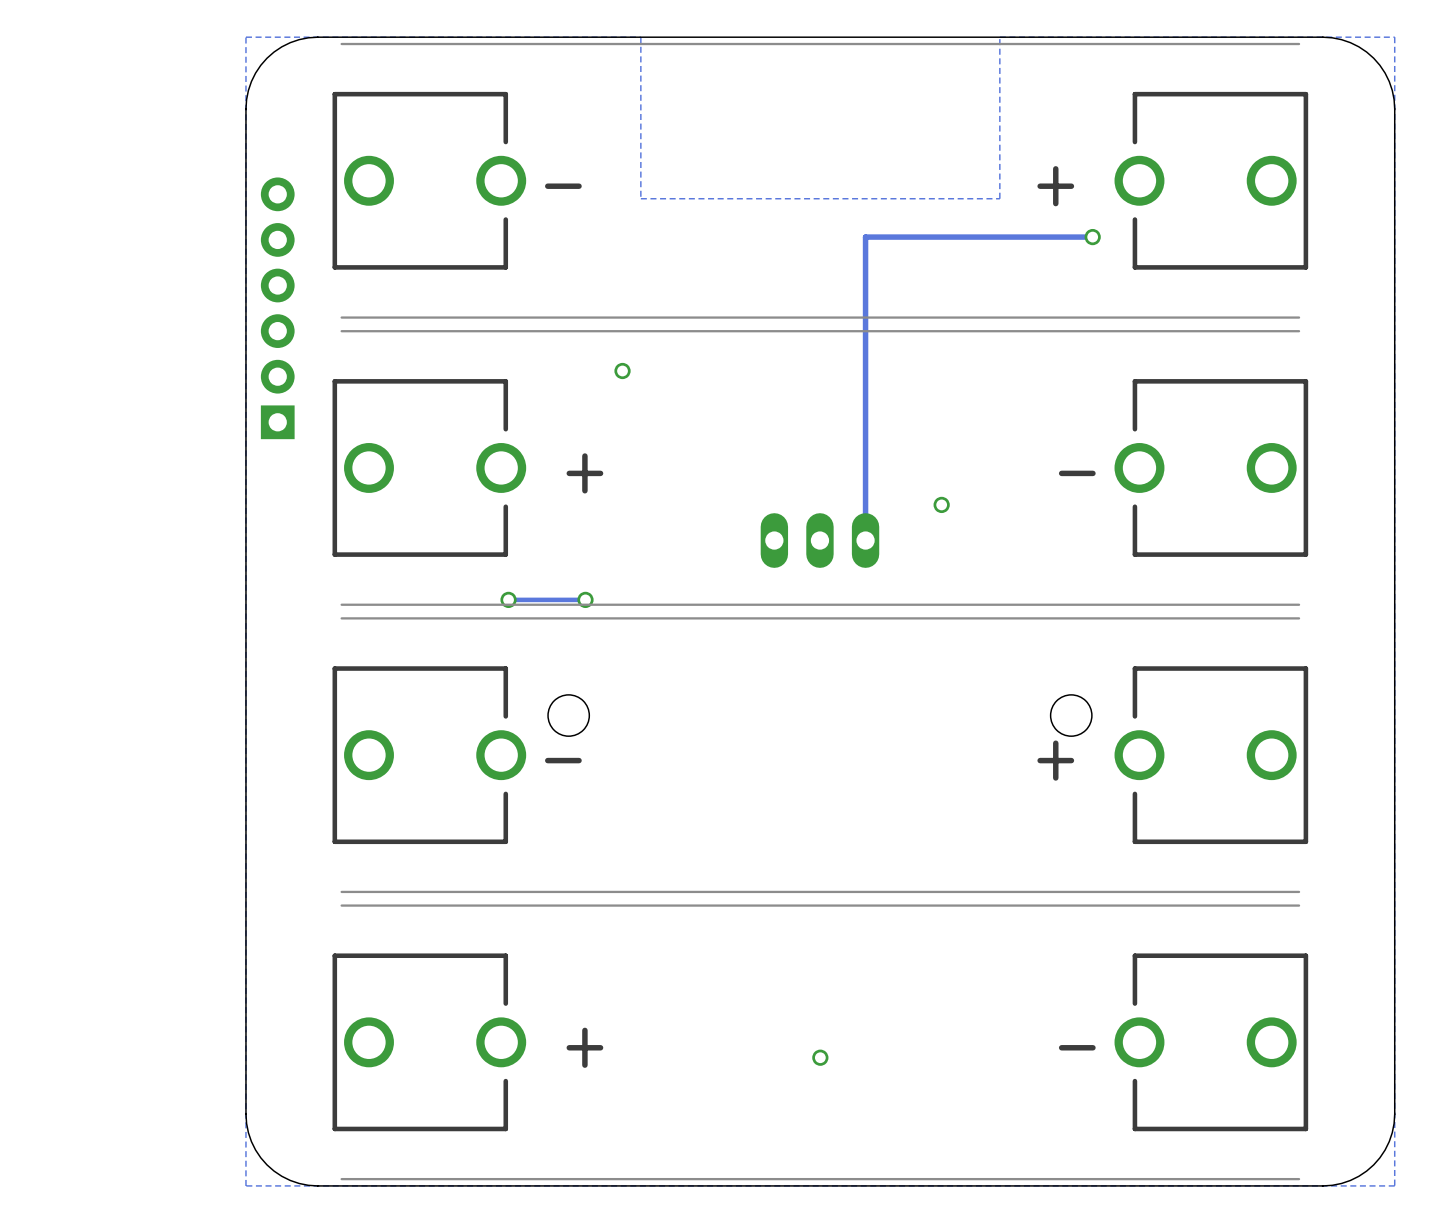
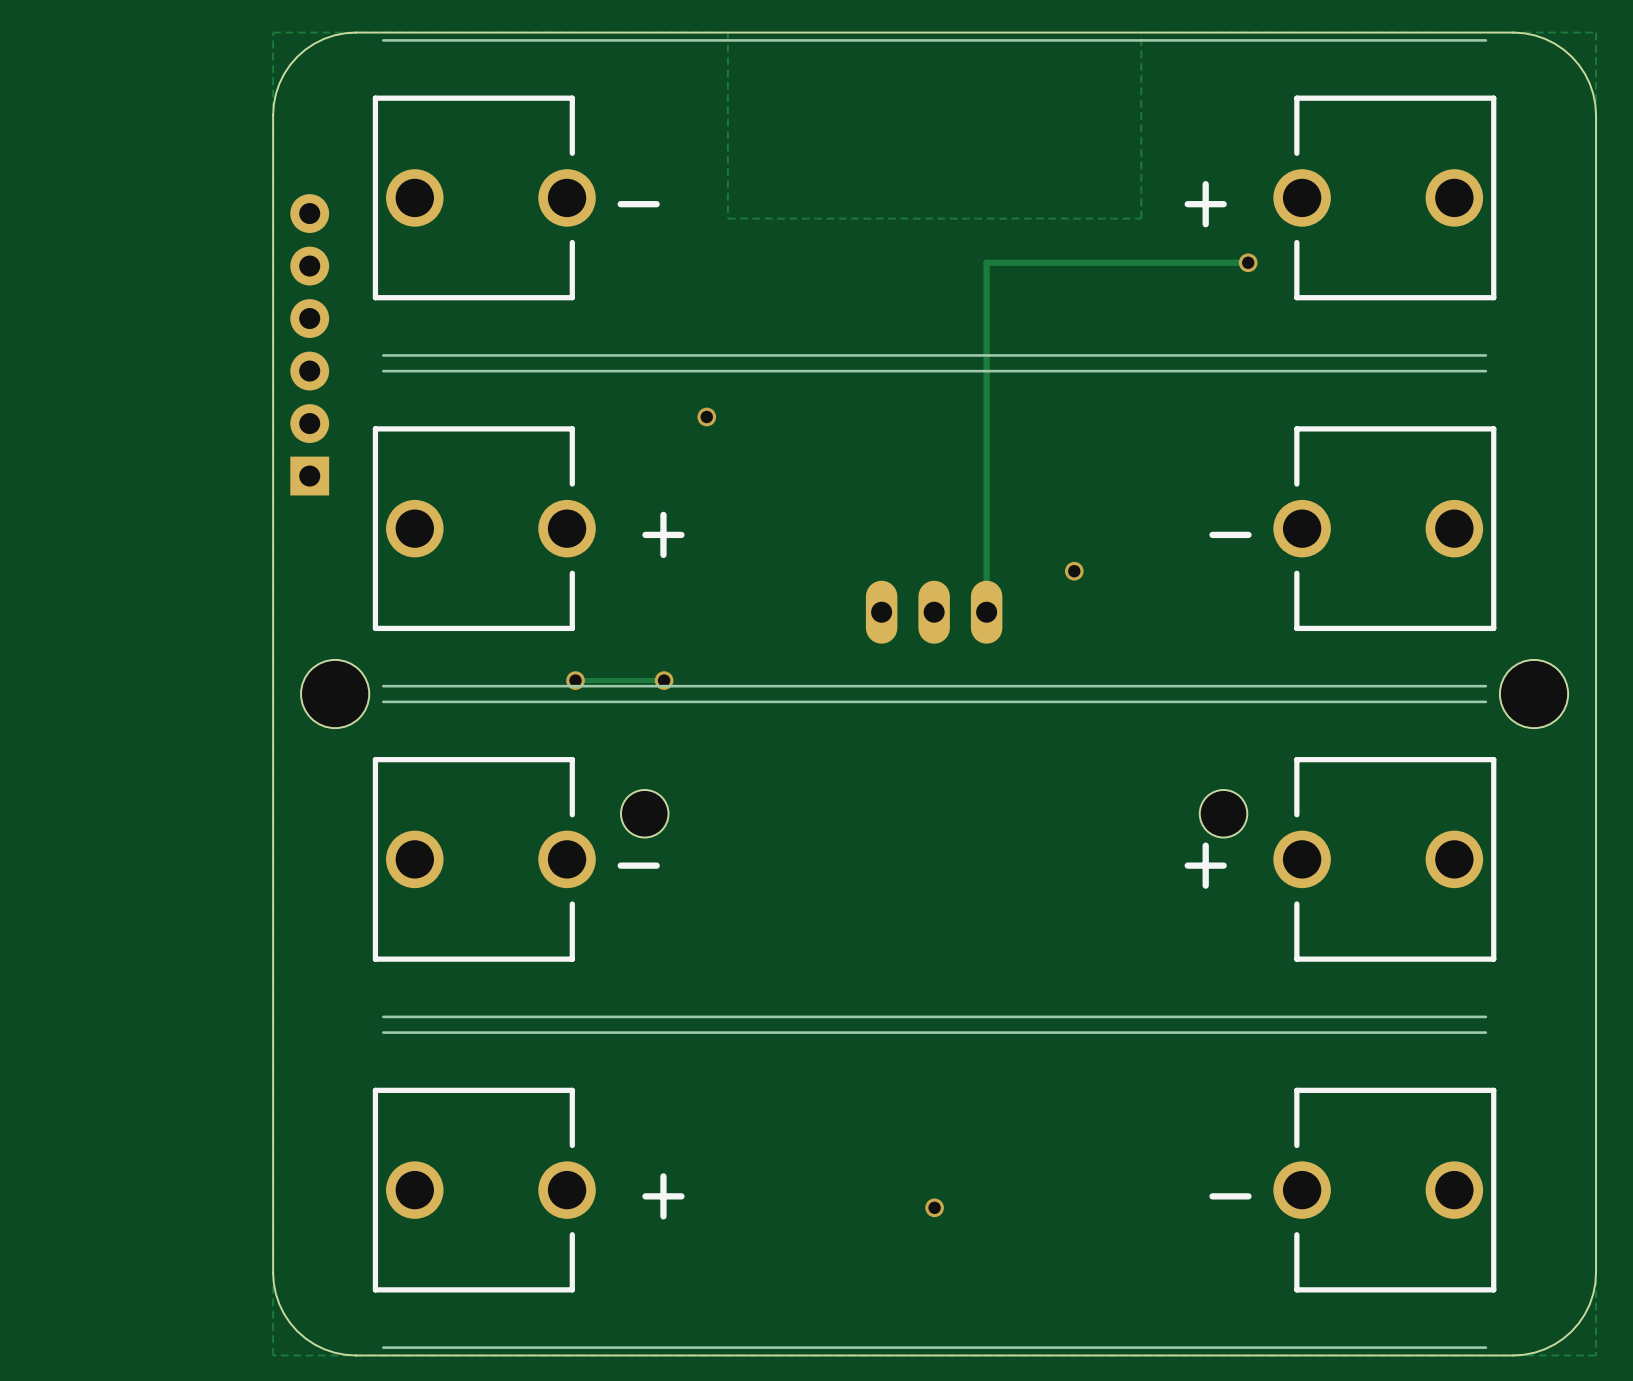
hole: none -> (335, 694)
hole: none -> (1534, 694)

